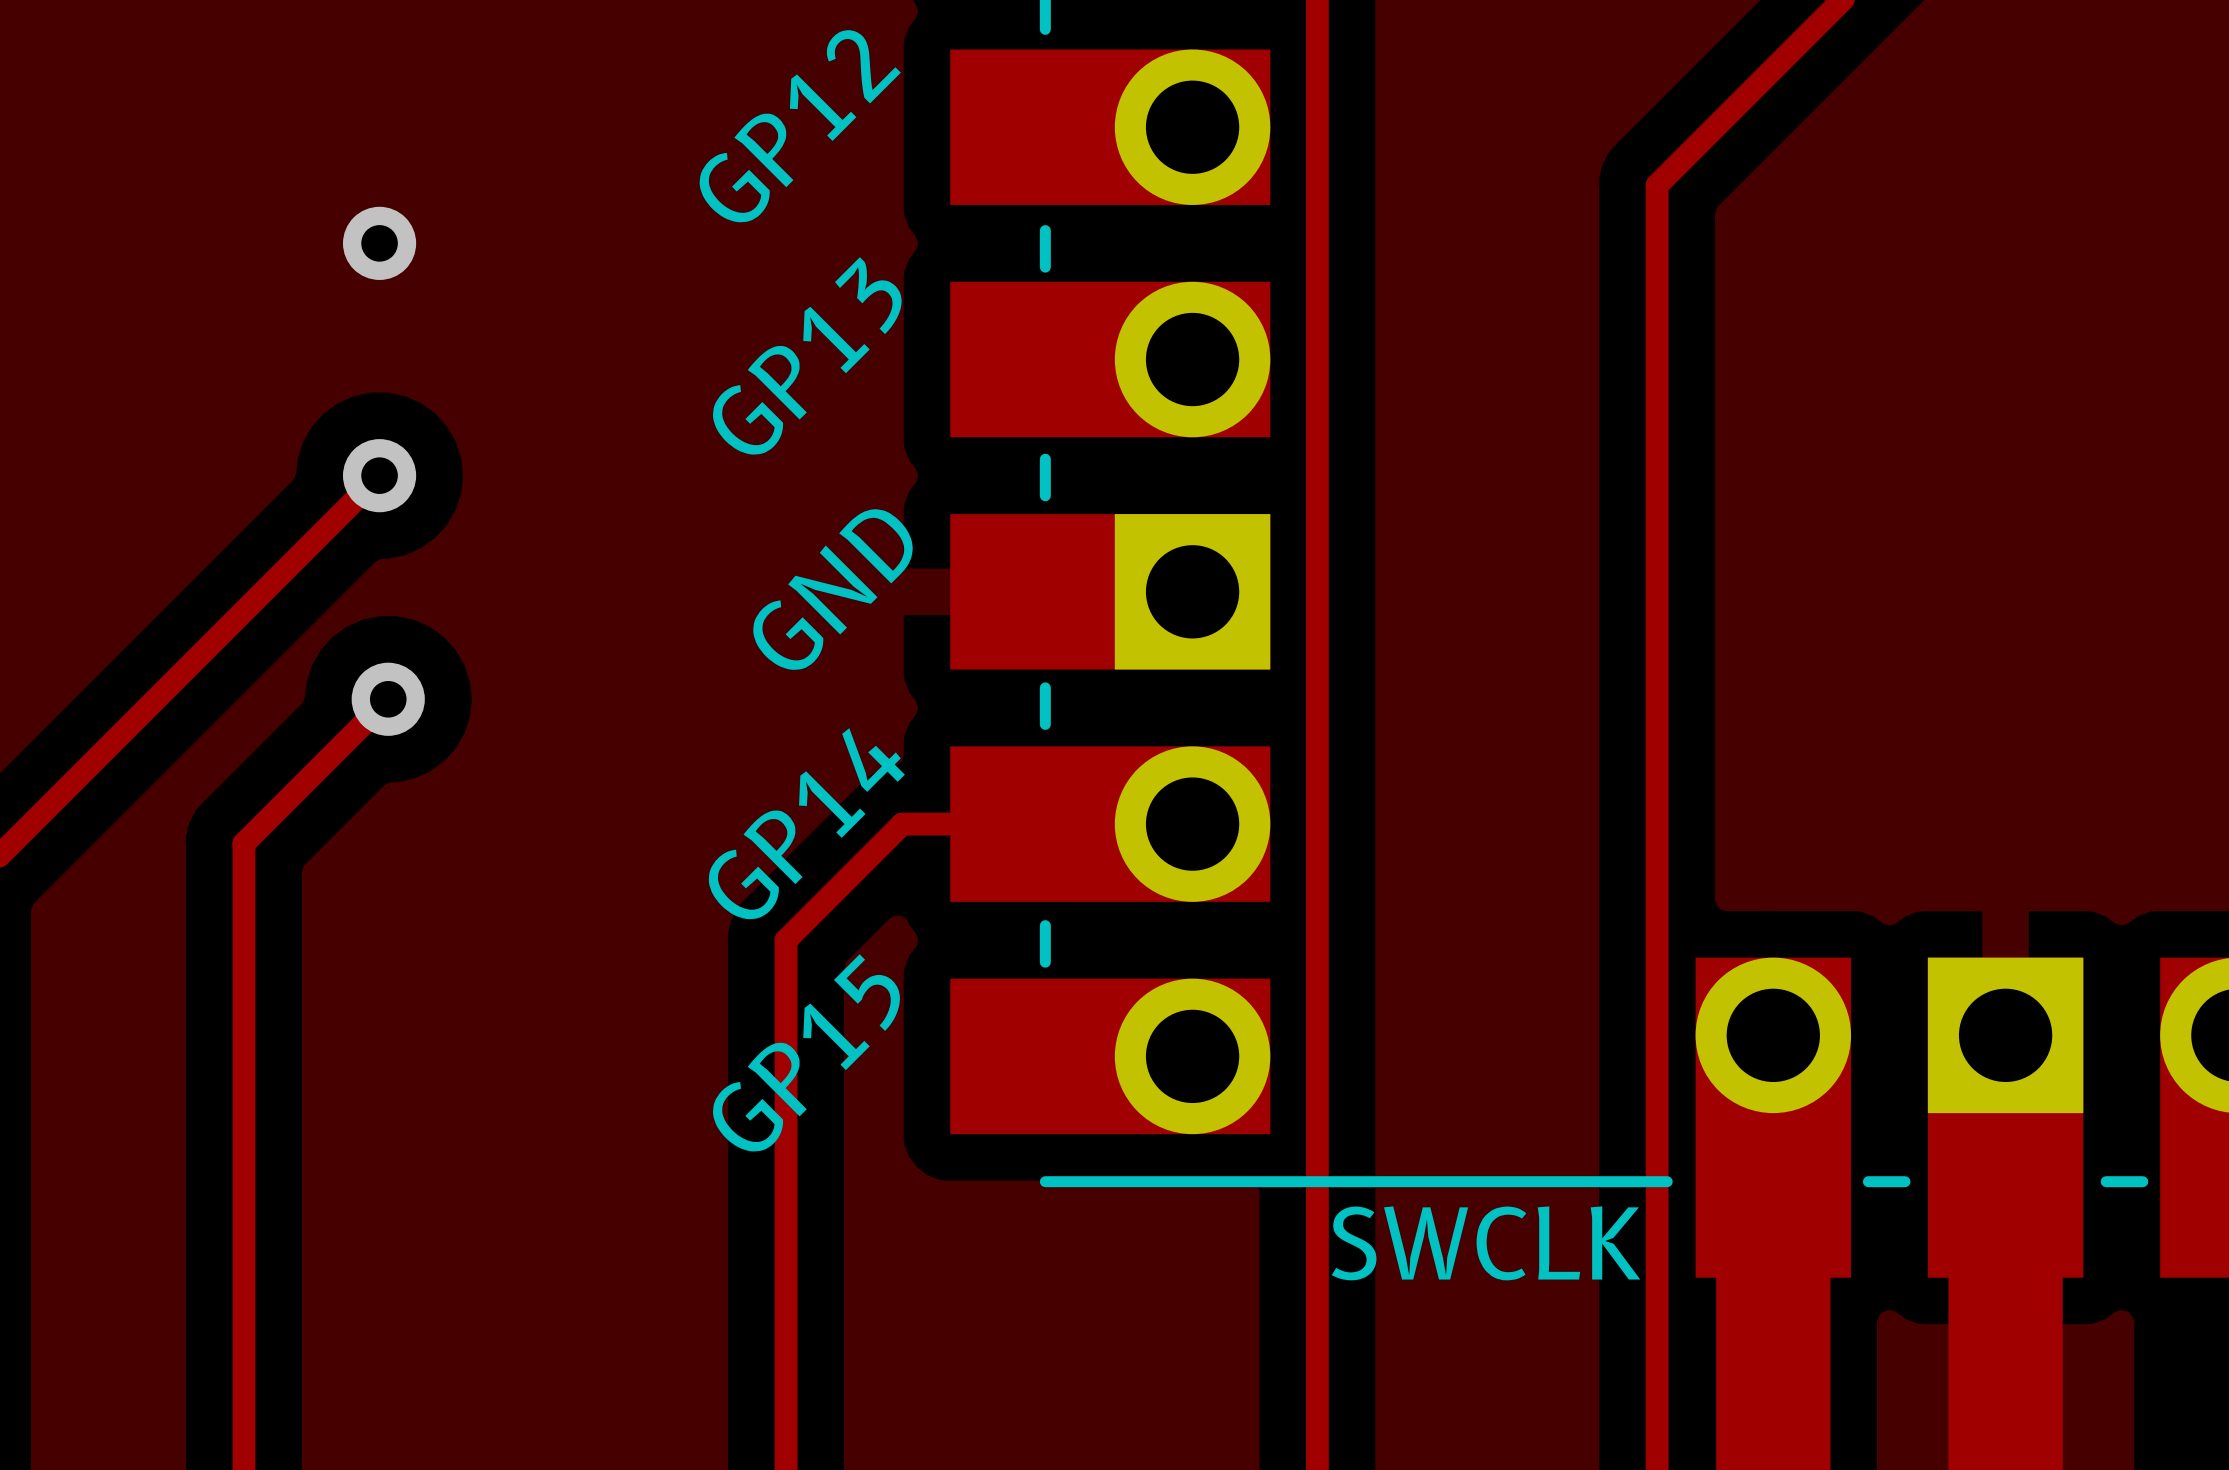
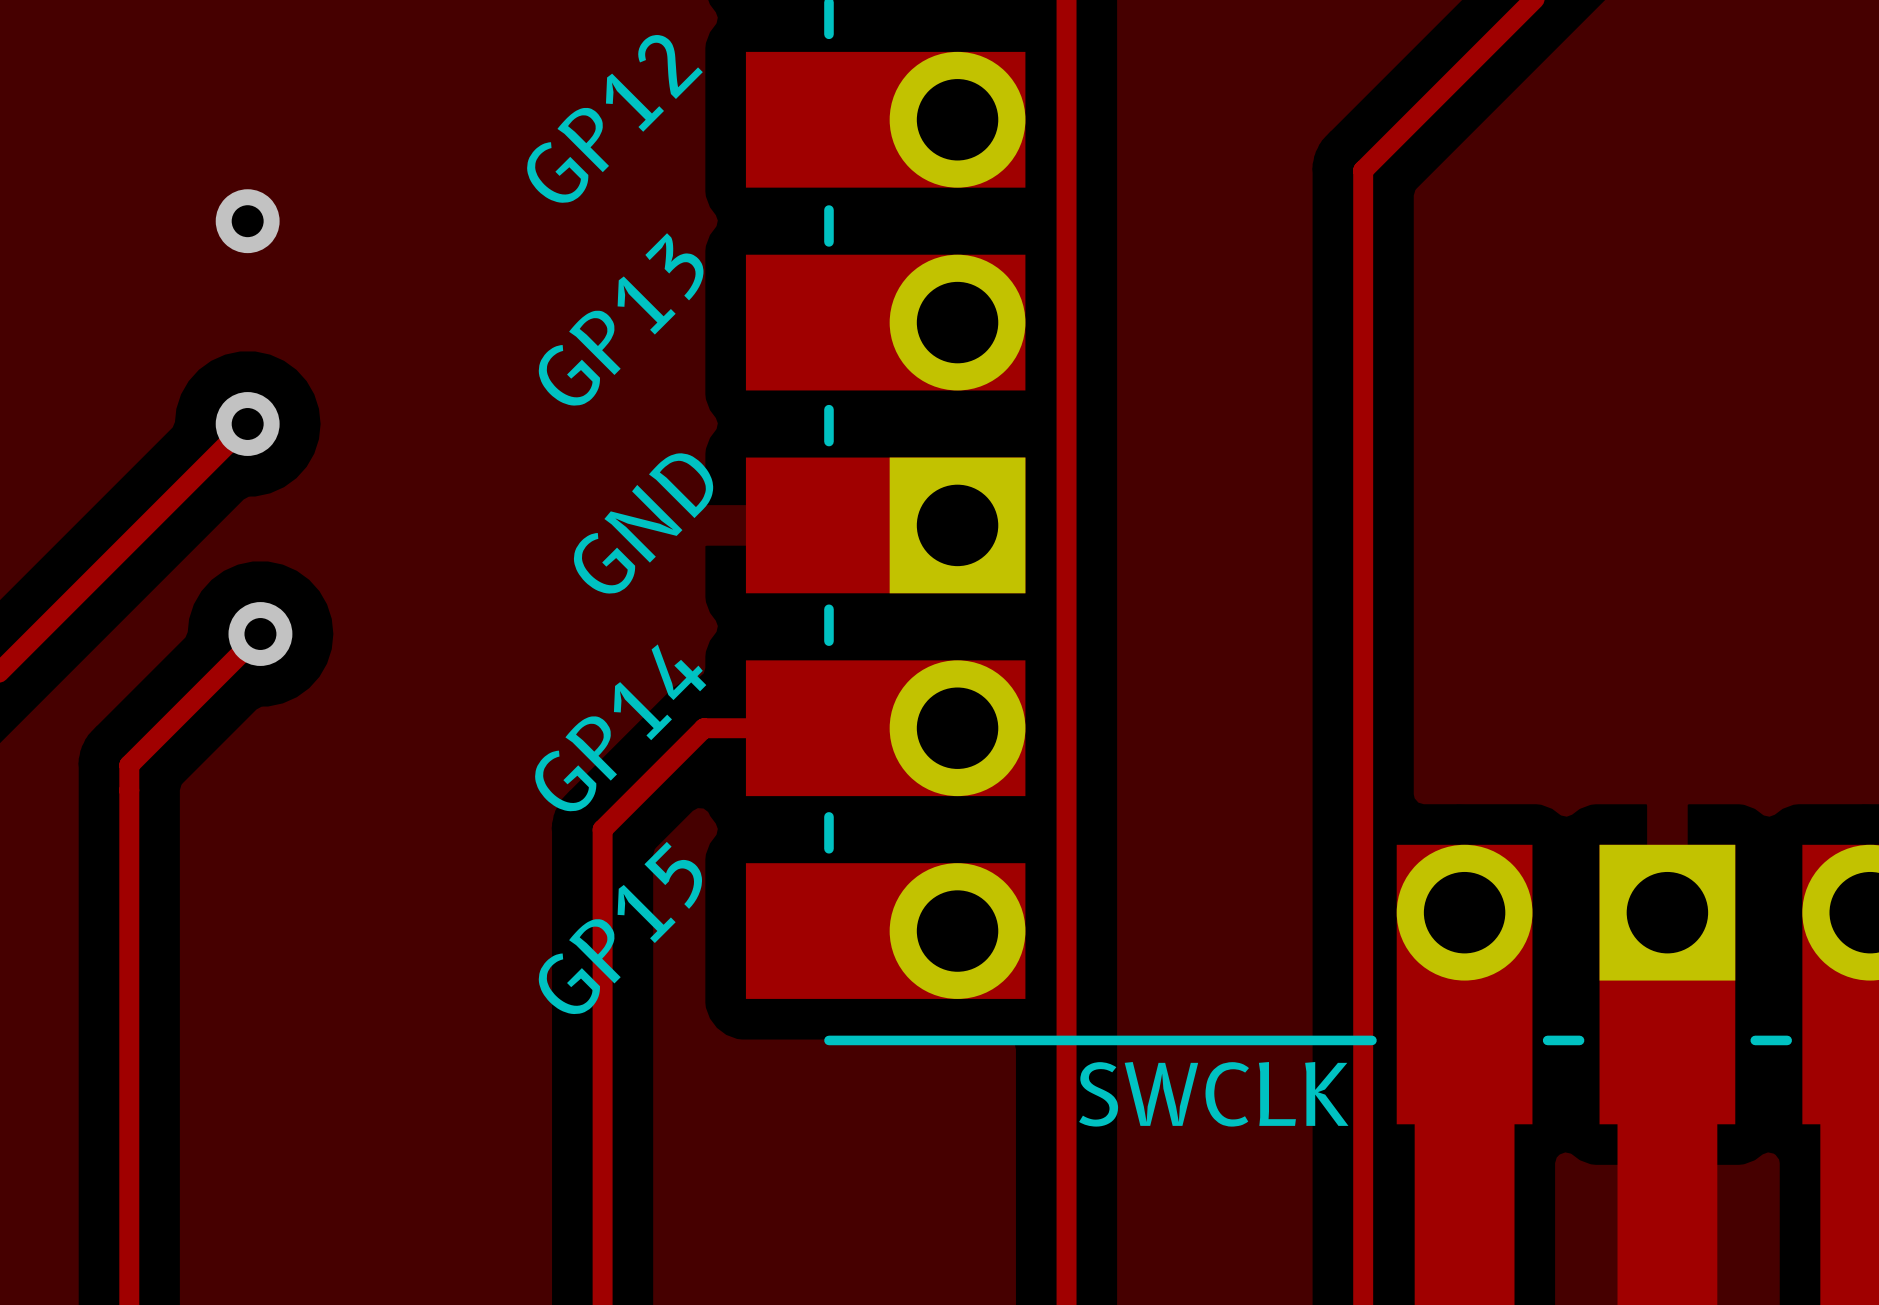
track: (388, 699) (243, 843) (243, 866) -> (260, 634) (129, 765)
via position: (388, 699) -> (260, 634)

